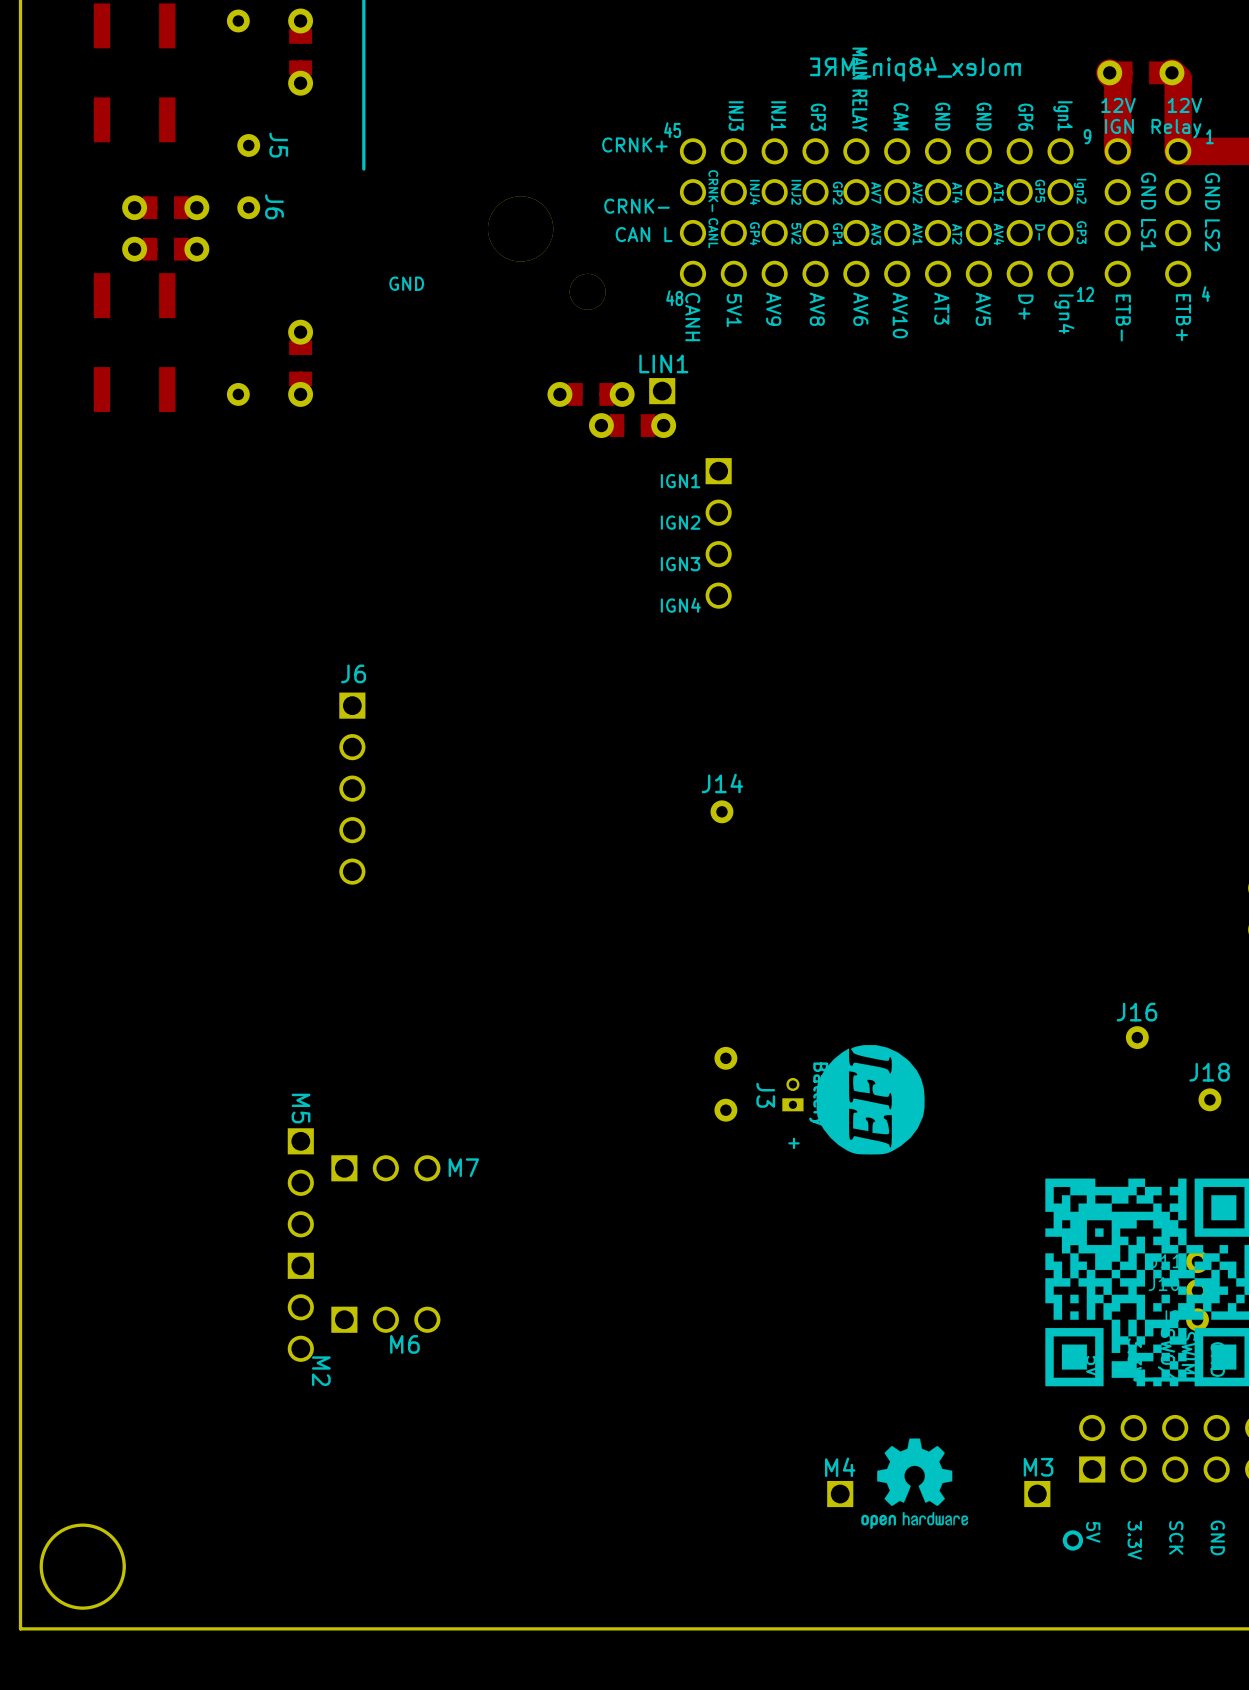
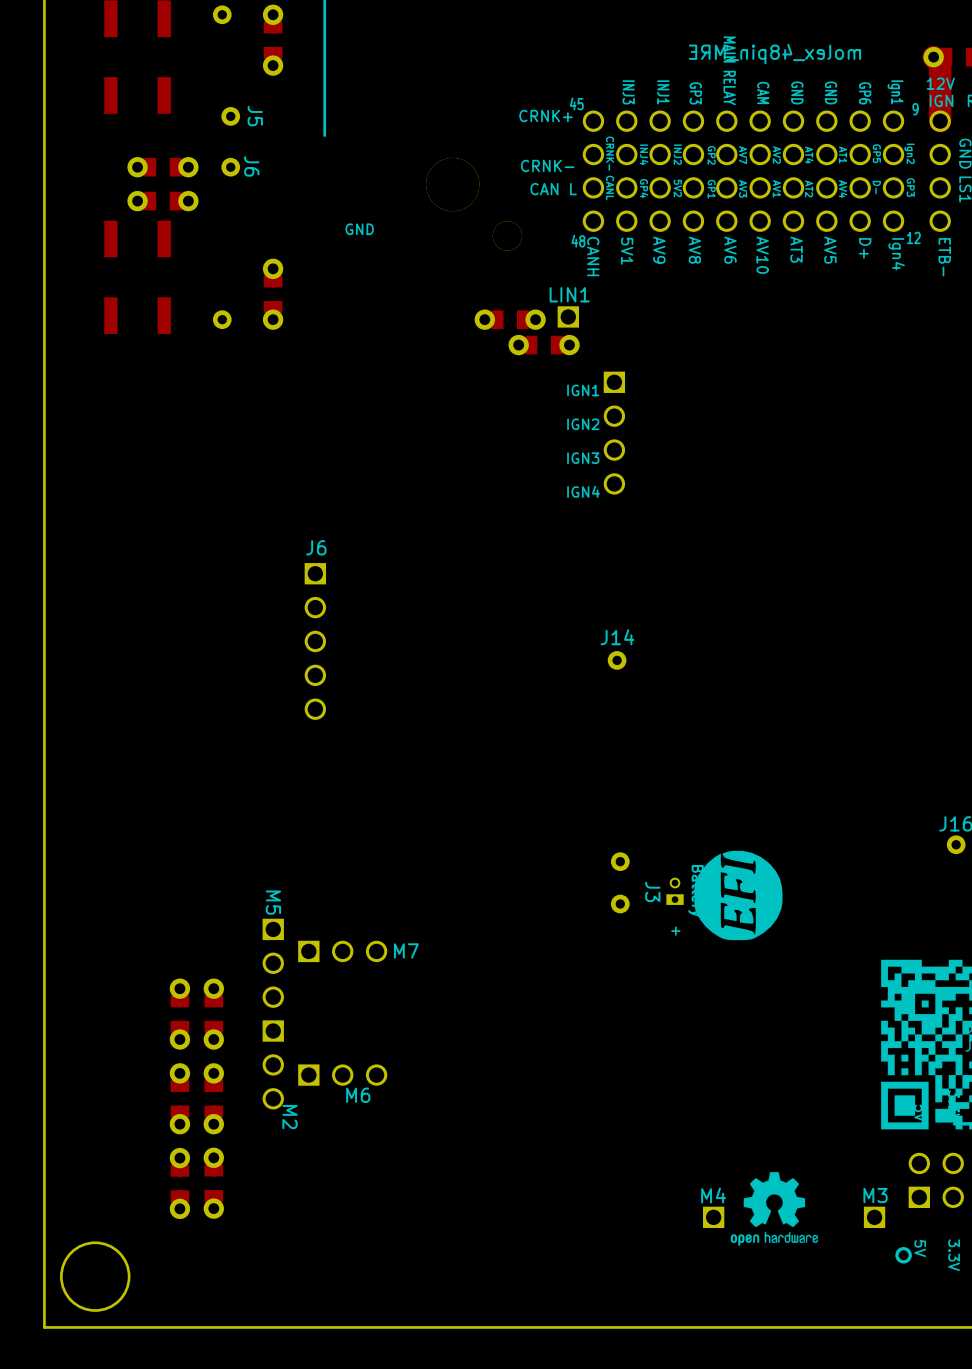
part: none -> (179, 1014)
part: none -> (213, 1014)
part: none -> (179, 1098)
part: none -> (213, 1098)
part: none -> (179, 1183)
part: none -> (213, 1183)

